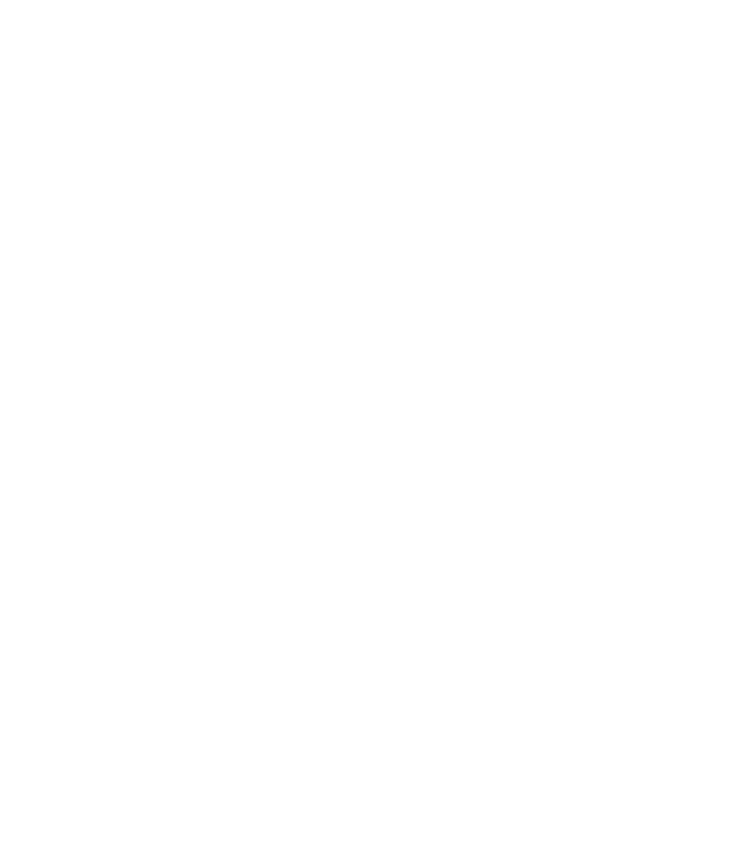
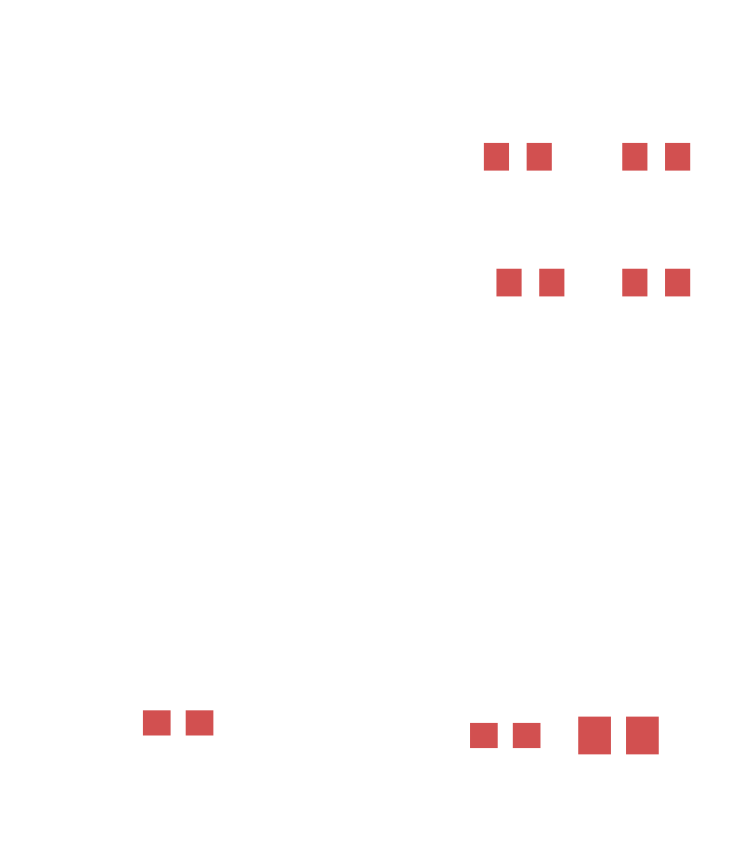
part: none -> (517, 156)
part: none -> (656, 156)
part: none -> (530, 282)
part: none -> (656, 282)
part: none -> (178, 722)
part: none -> (505, 735)
part: none -> (618, 735)

